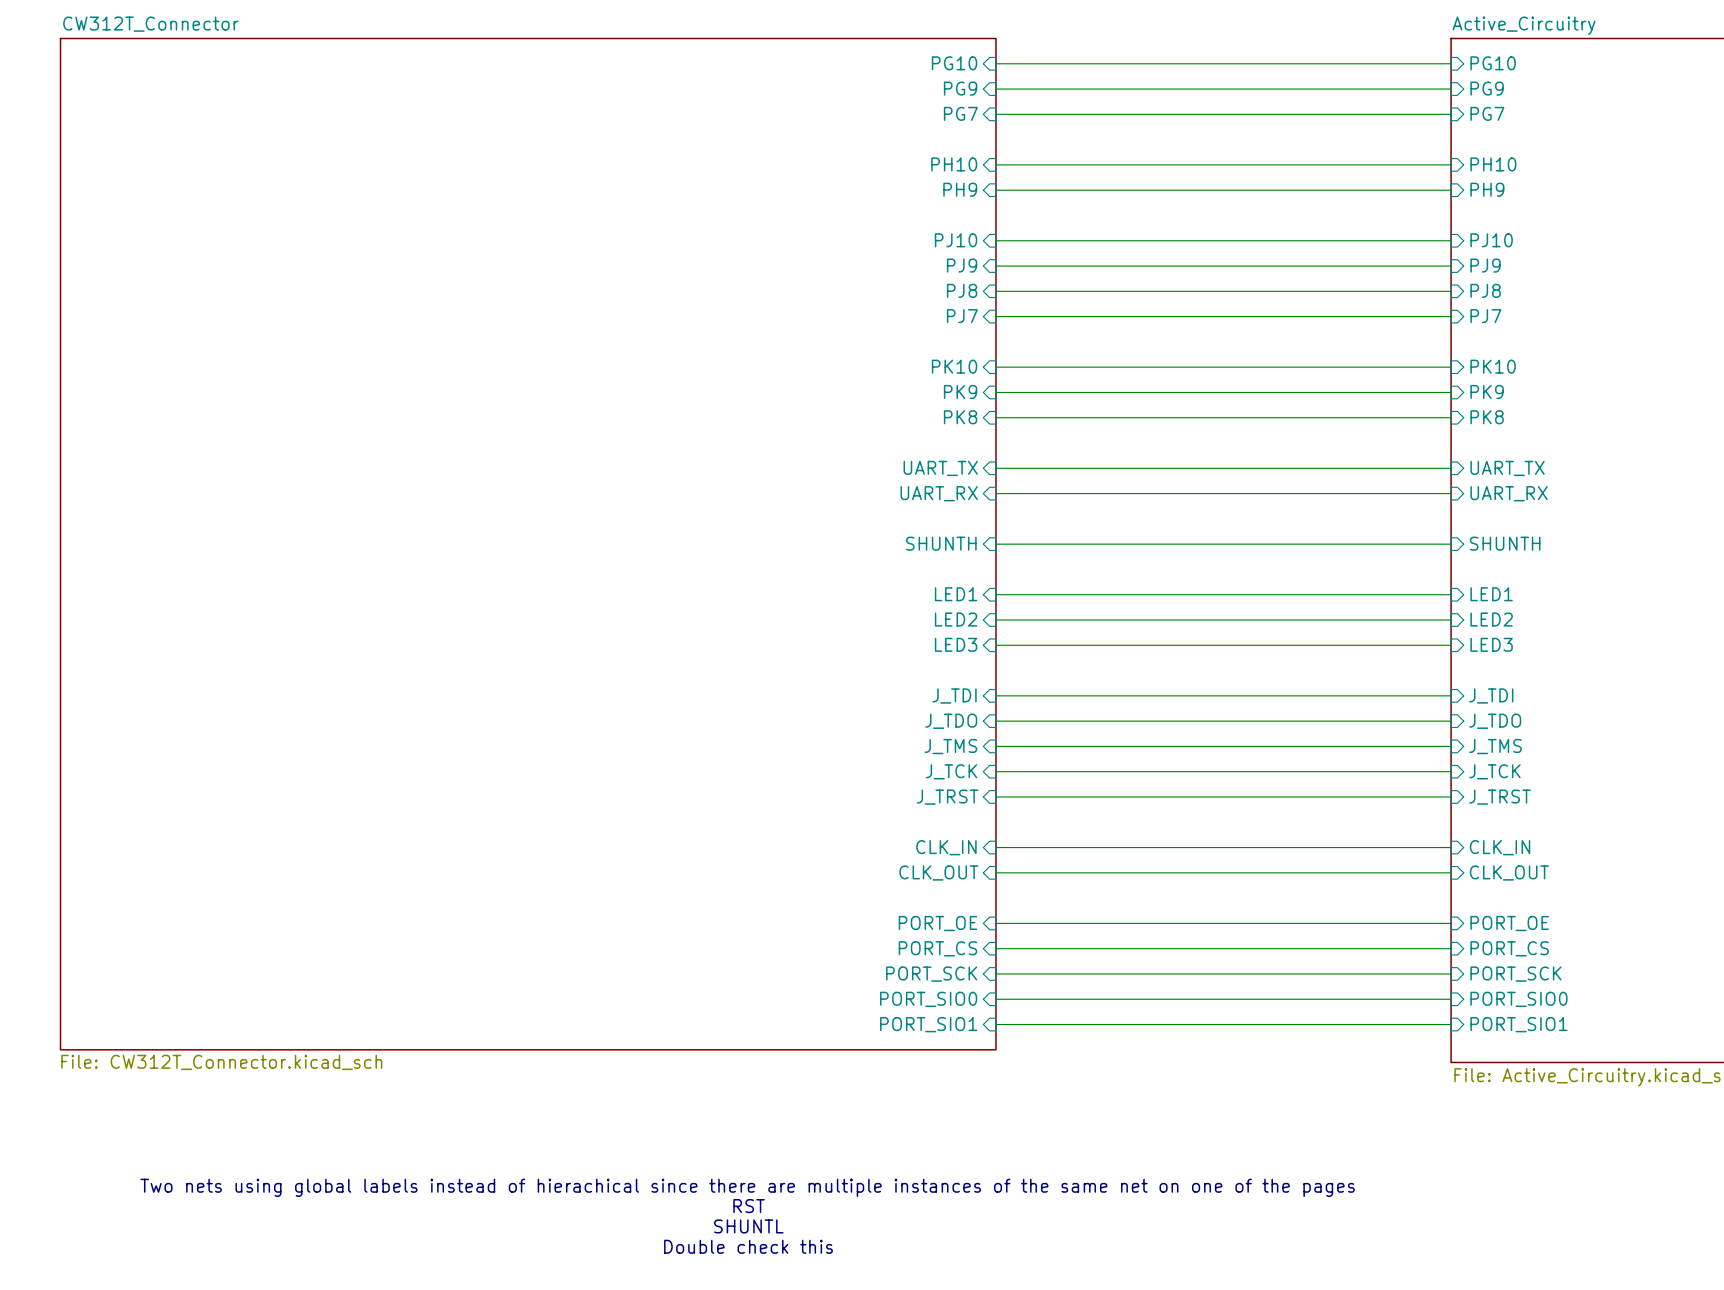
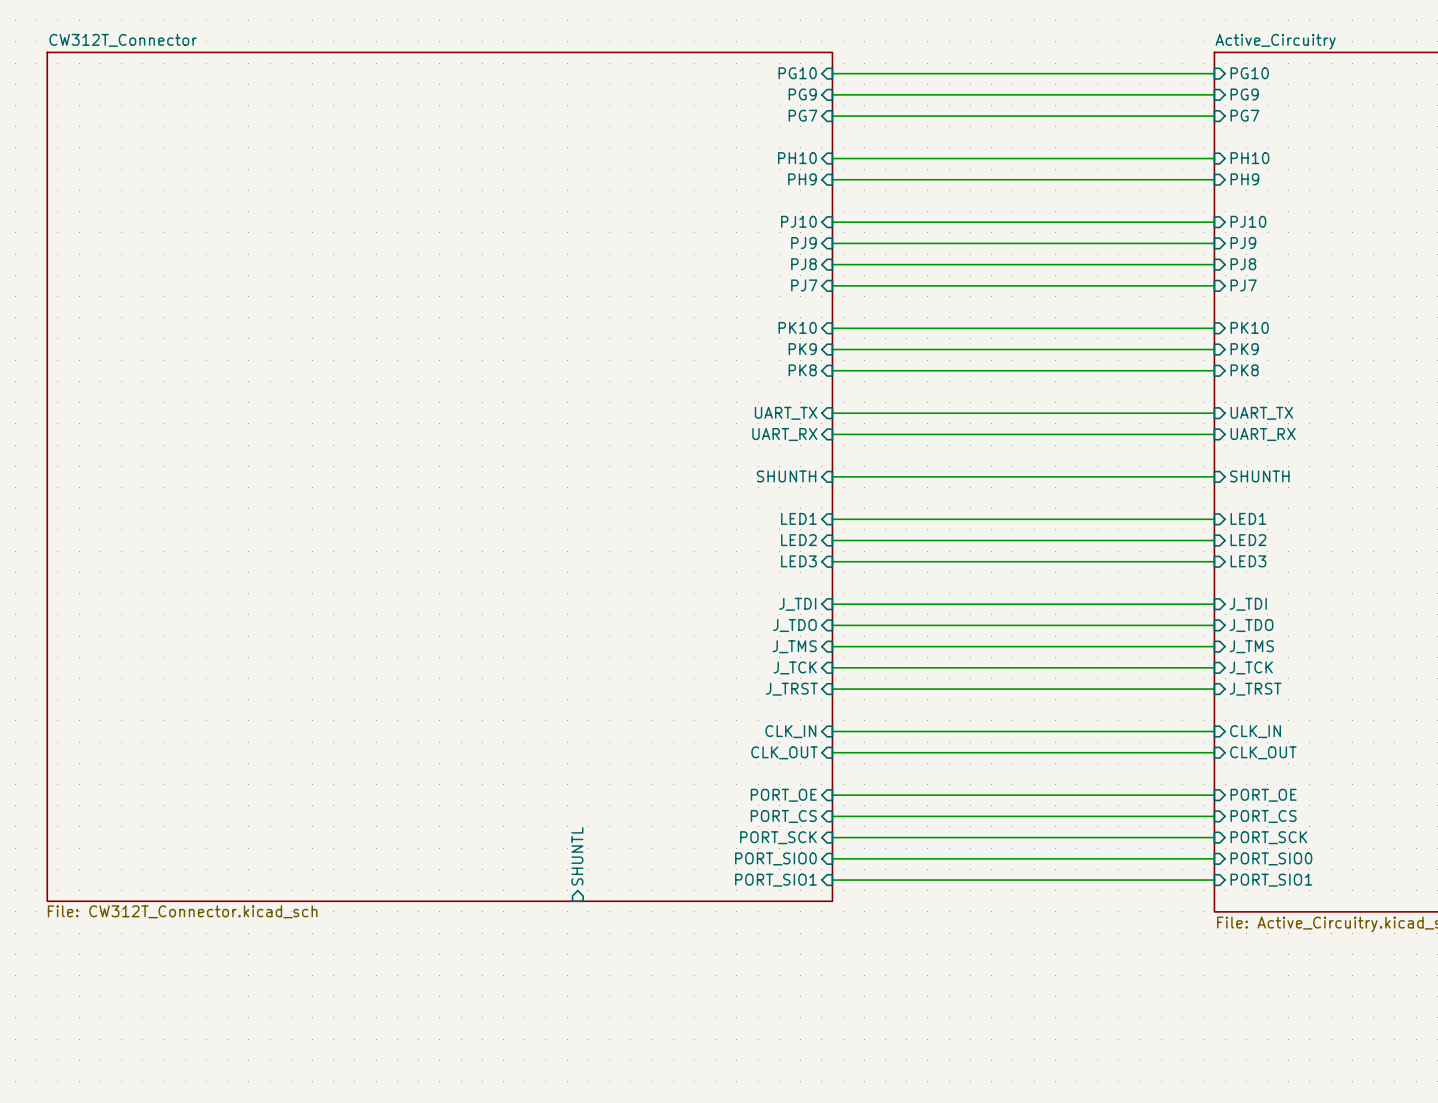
sheet pin: none -> SHUNTL (577, 856)
text: Two nets using global labels instead of hierachical since there are multiple instances of the same net on one of the pages (747, 1187) -> none
text: RST (749, 1206) -> none
text: SHUNTL (748, 1226) -> none
text: Double check this (748, 1246) -> none

